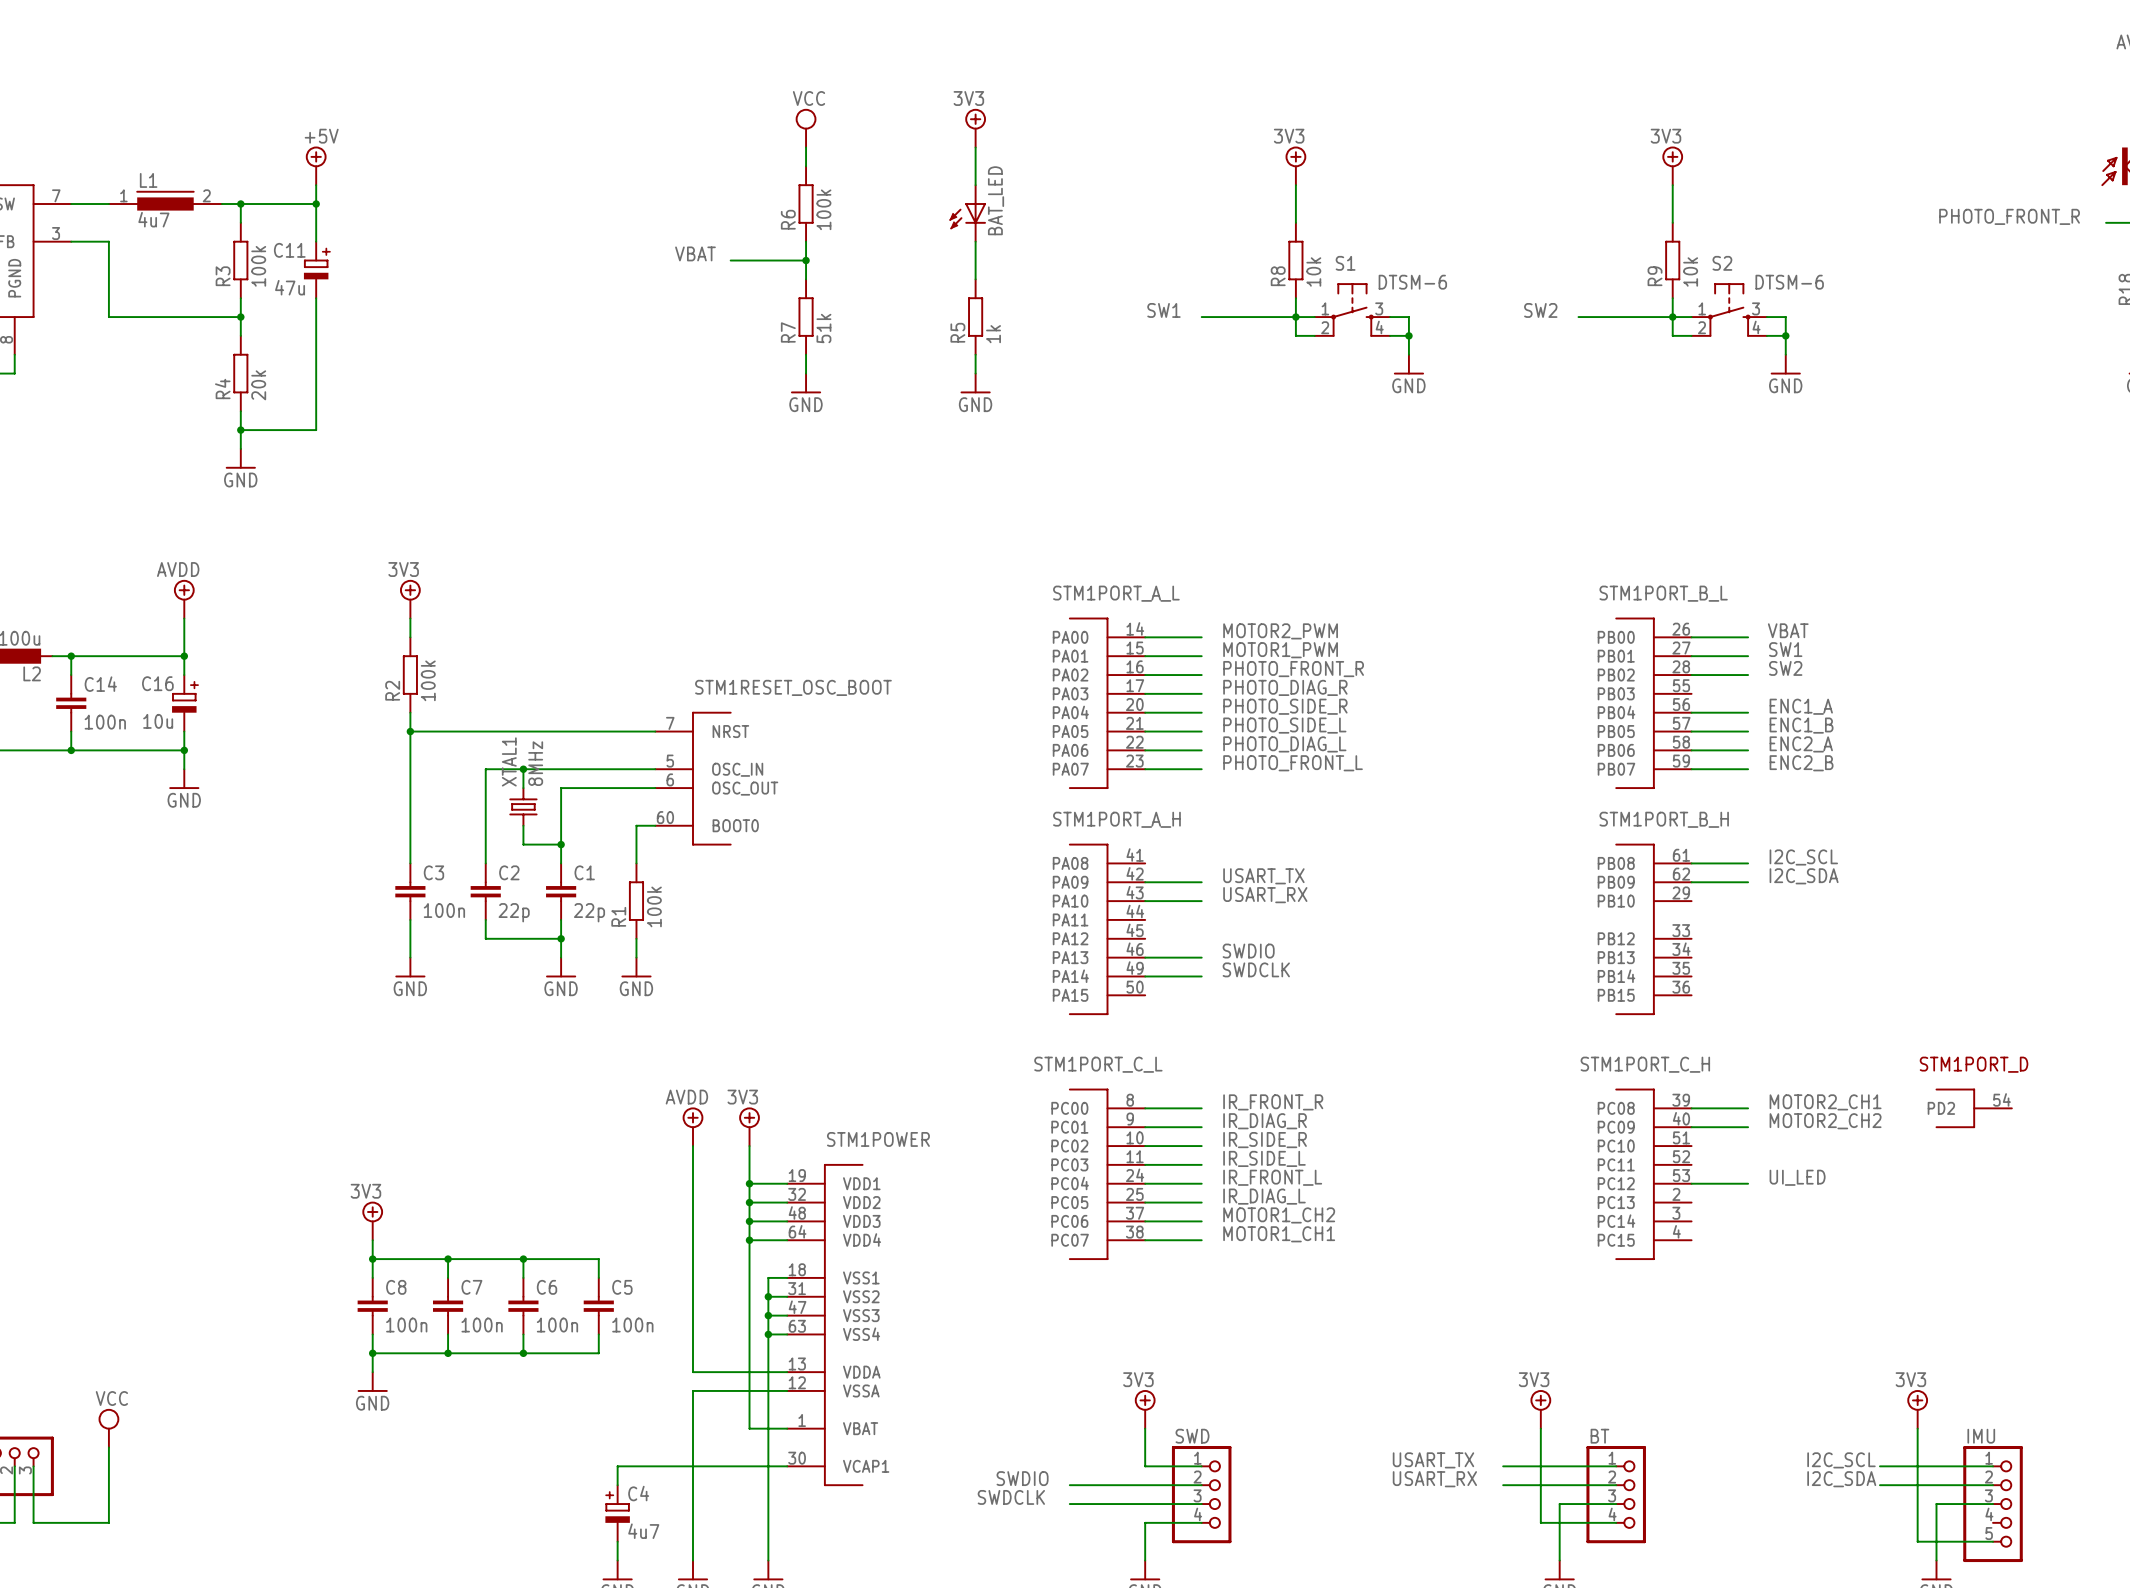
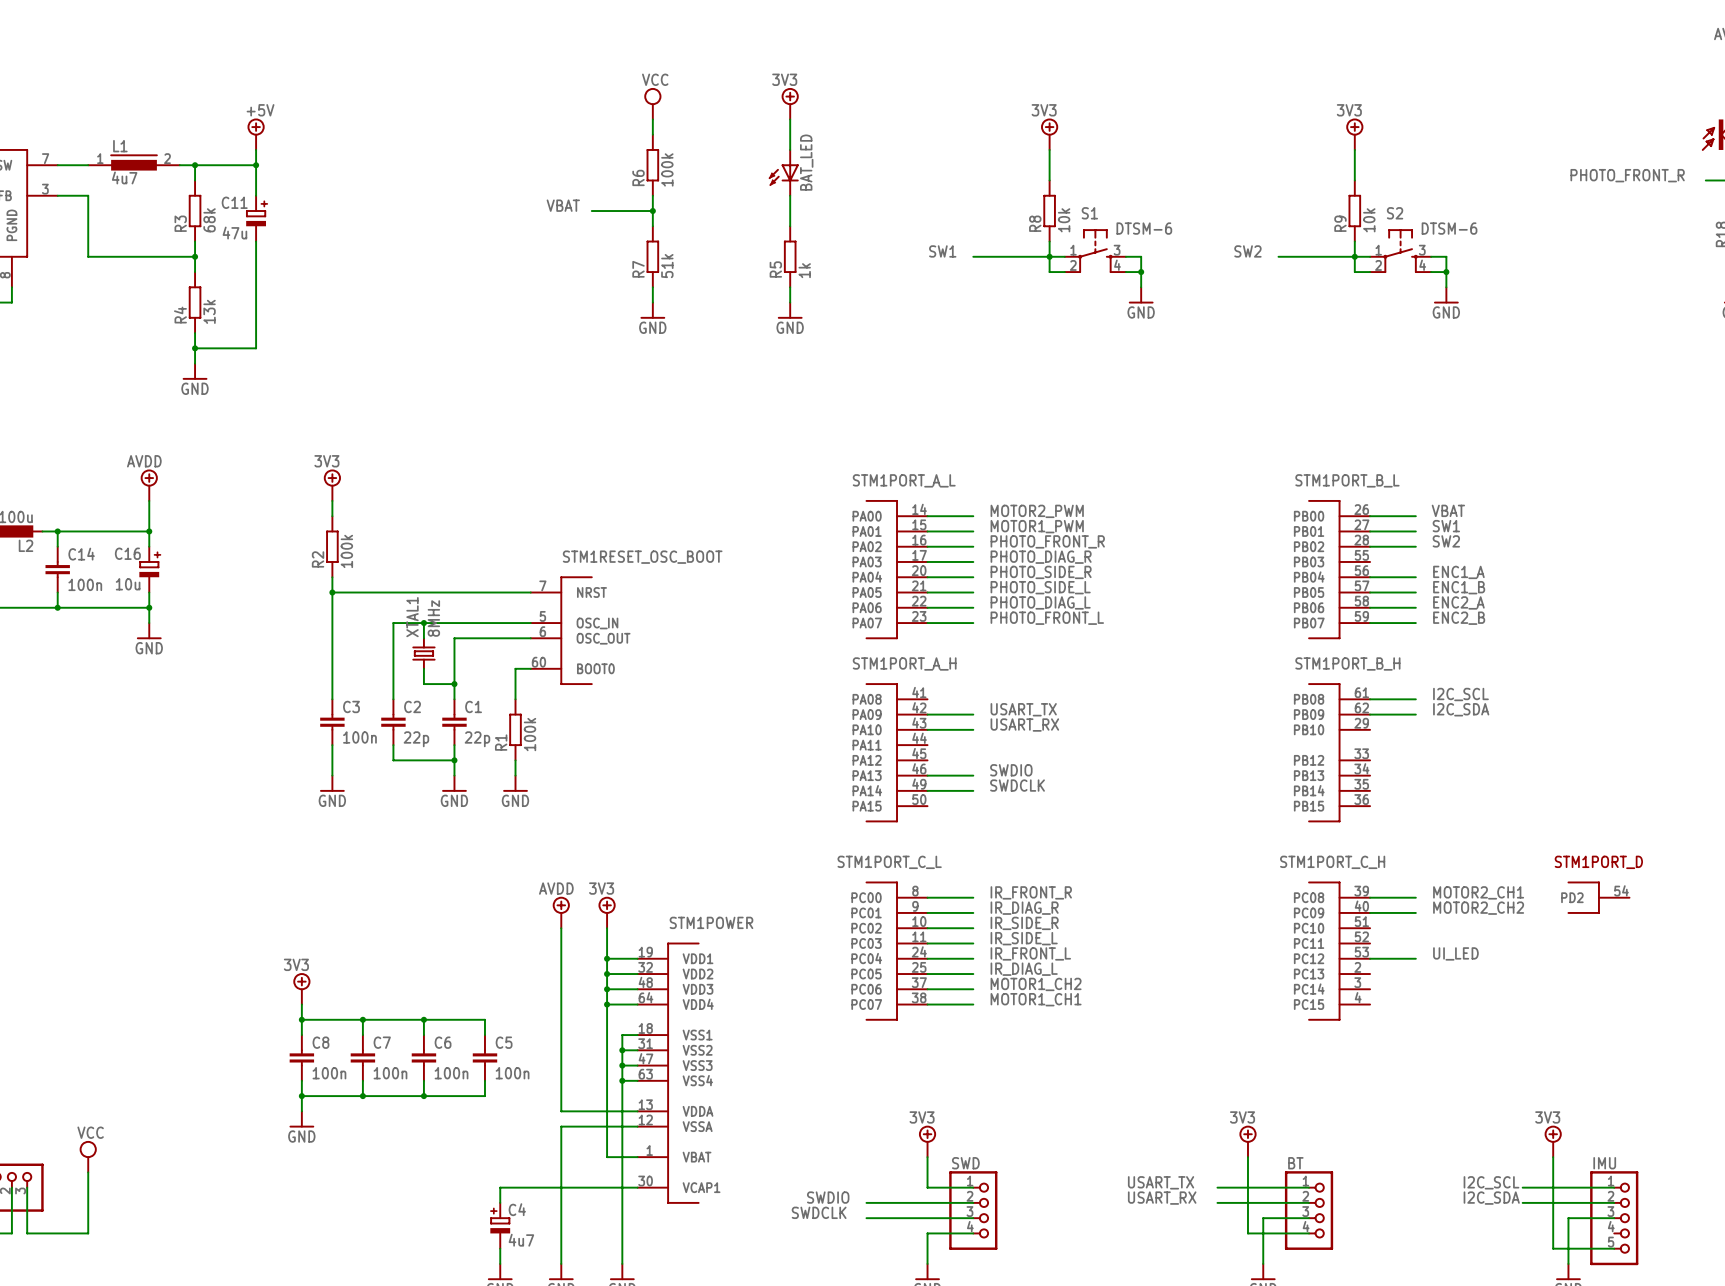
R3 value: 100k (258, 266) -> 68k (209, 220)
R4 value: 20k (258, 385) -> 13k (209, 311)

